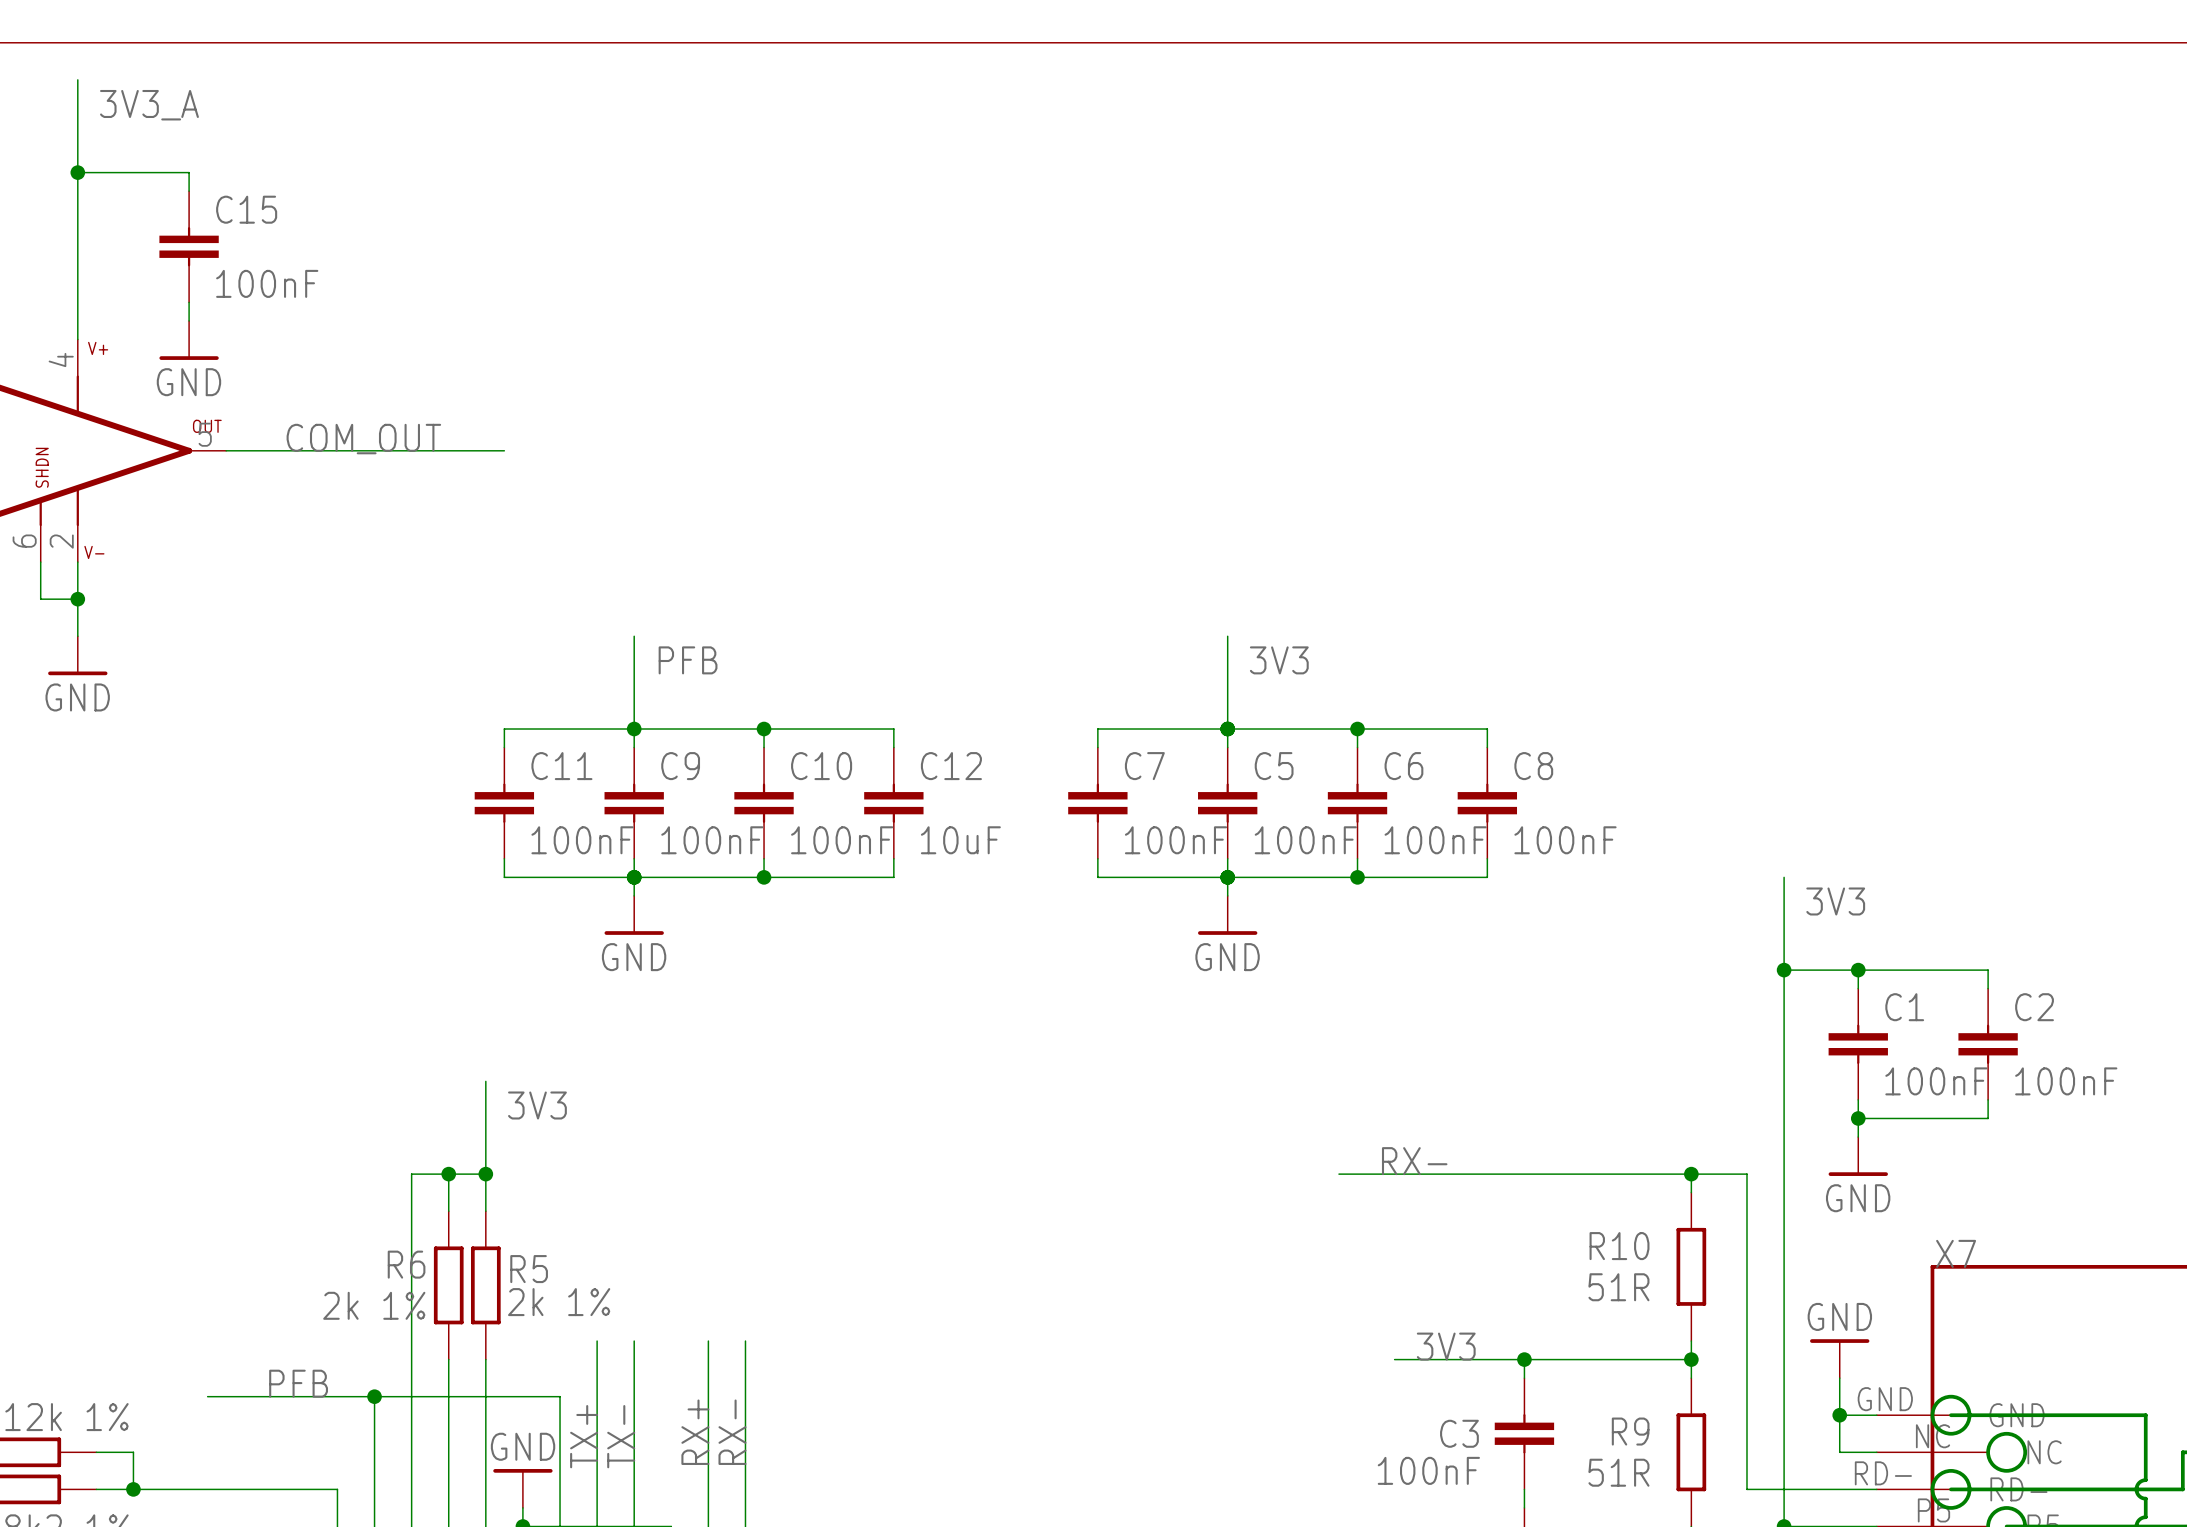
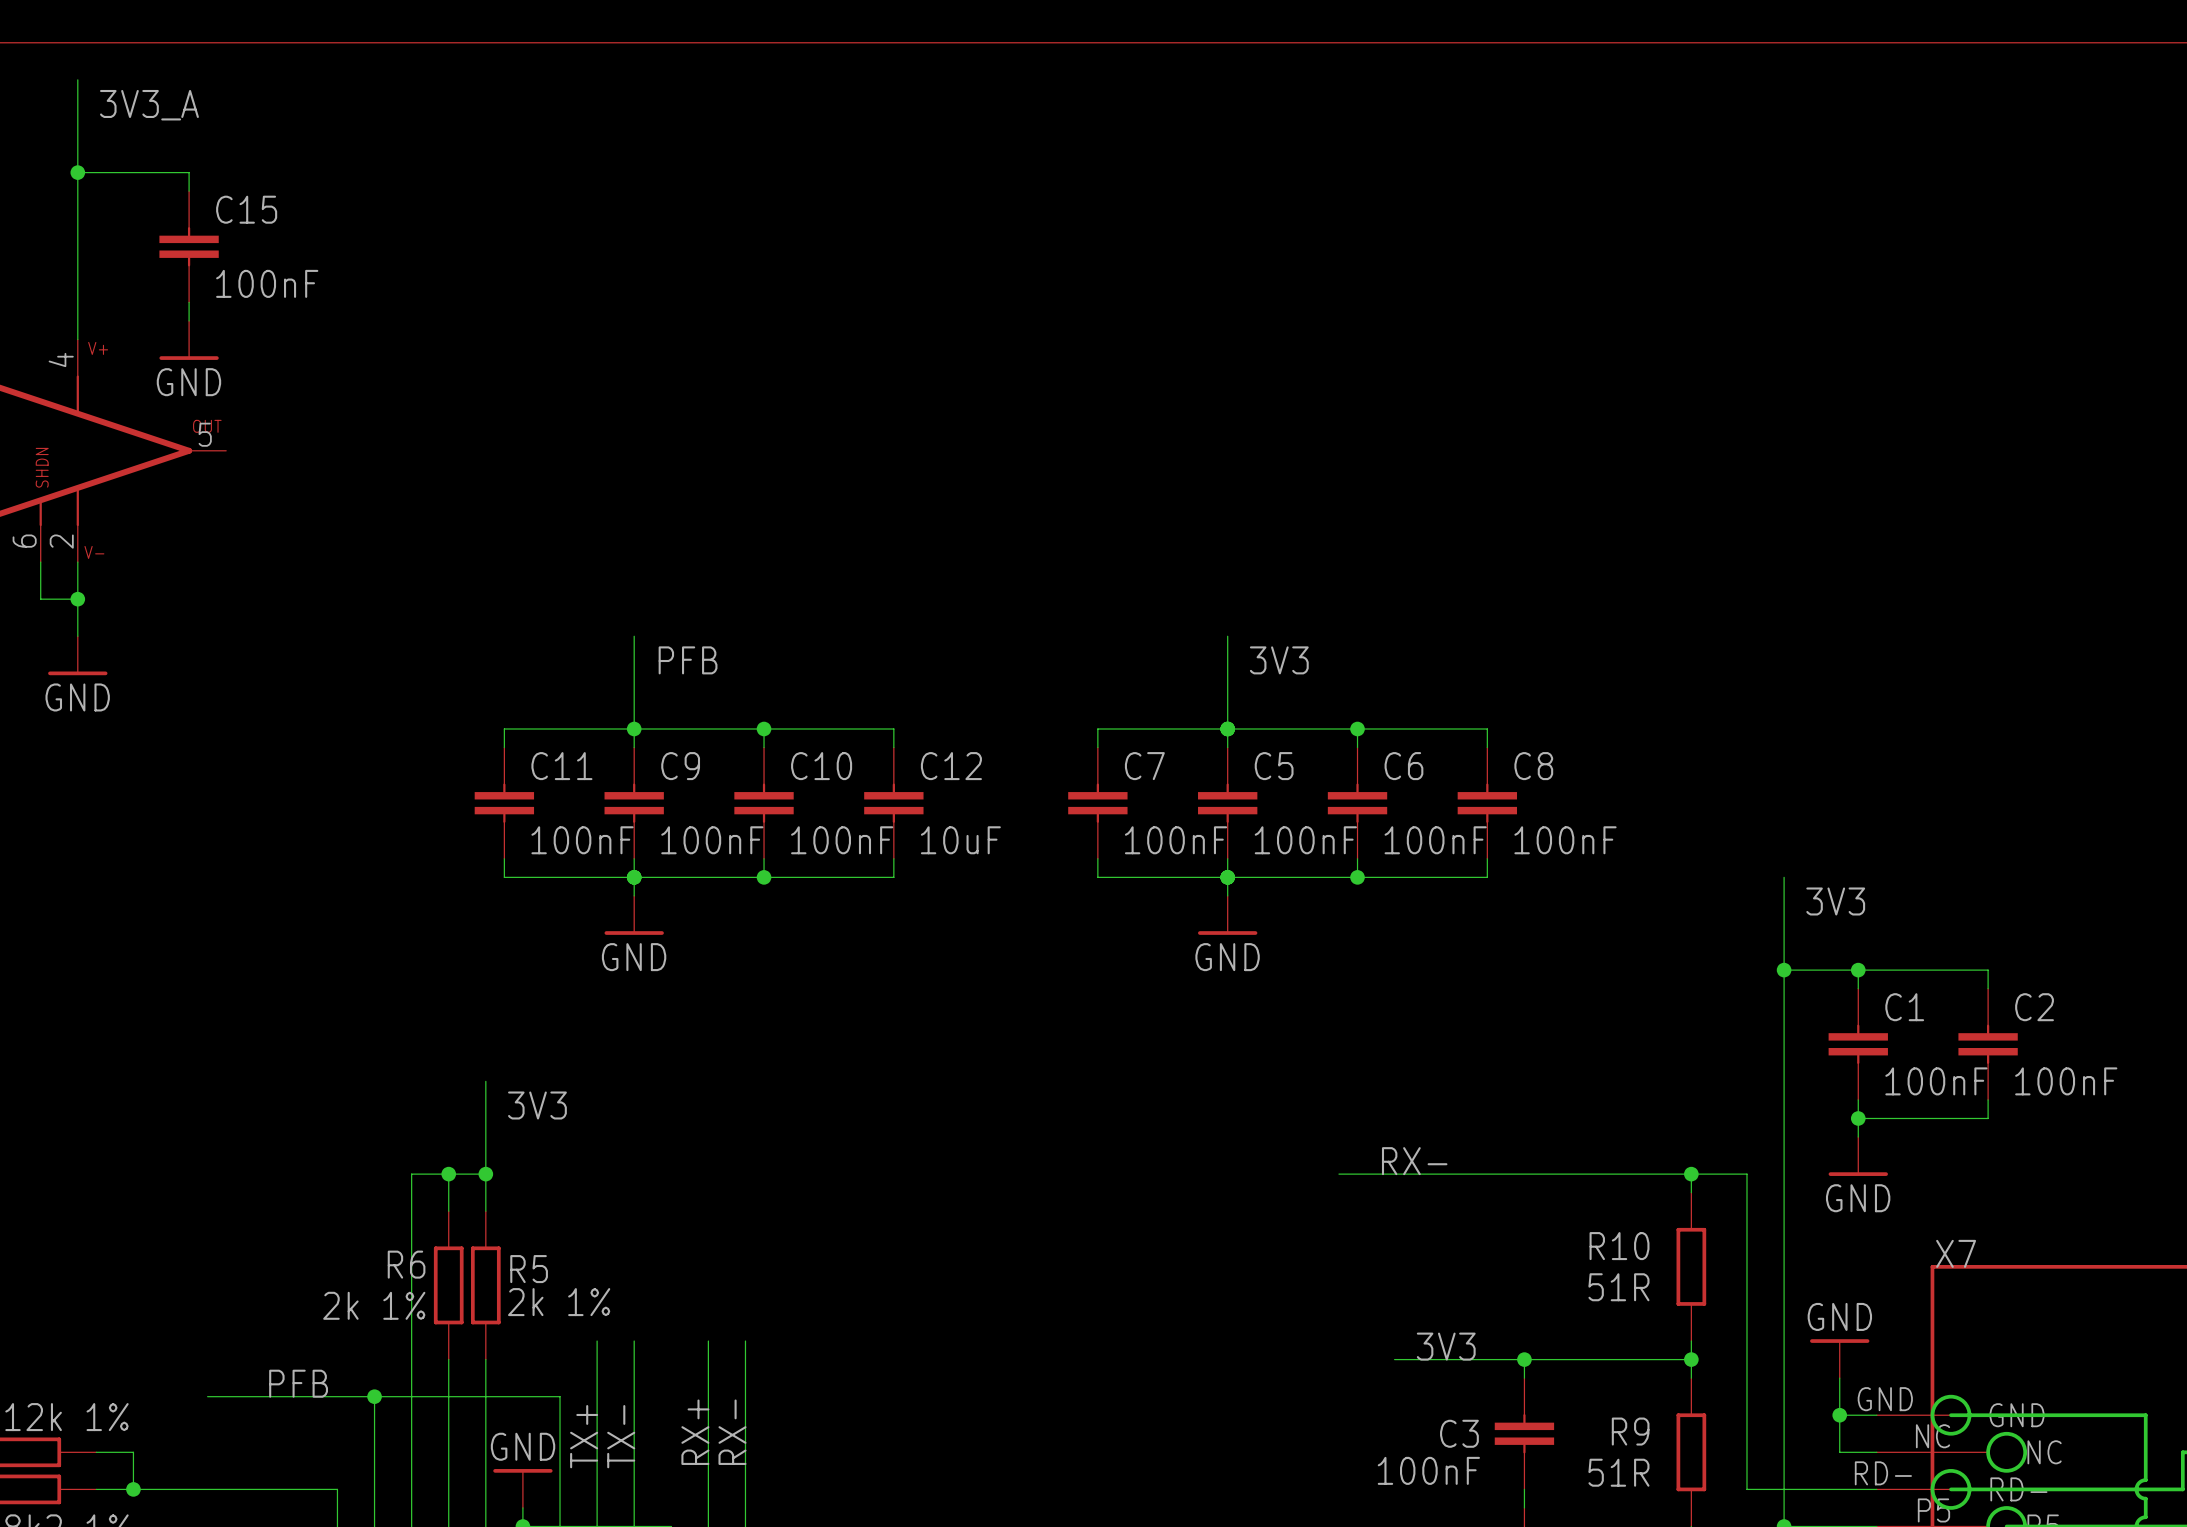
label: COM_OUT (363, 439) -> none
wire: (226, 450) (504, 450) -> none

